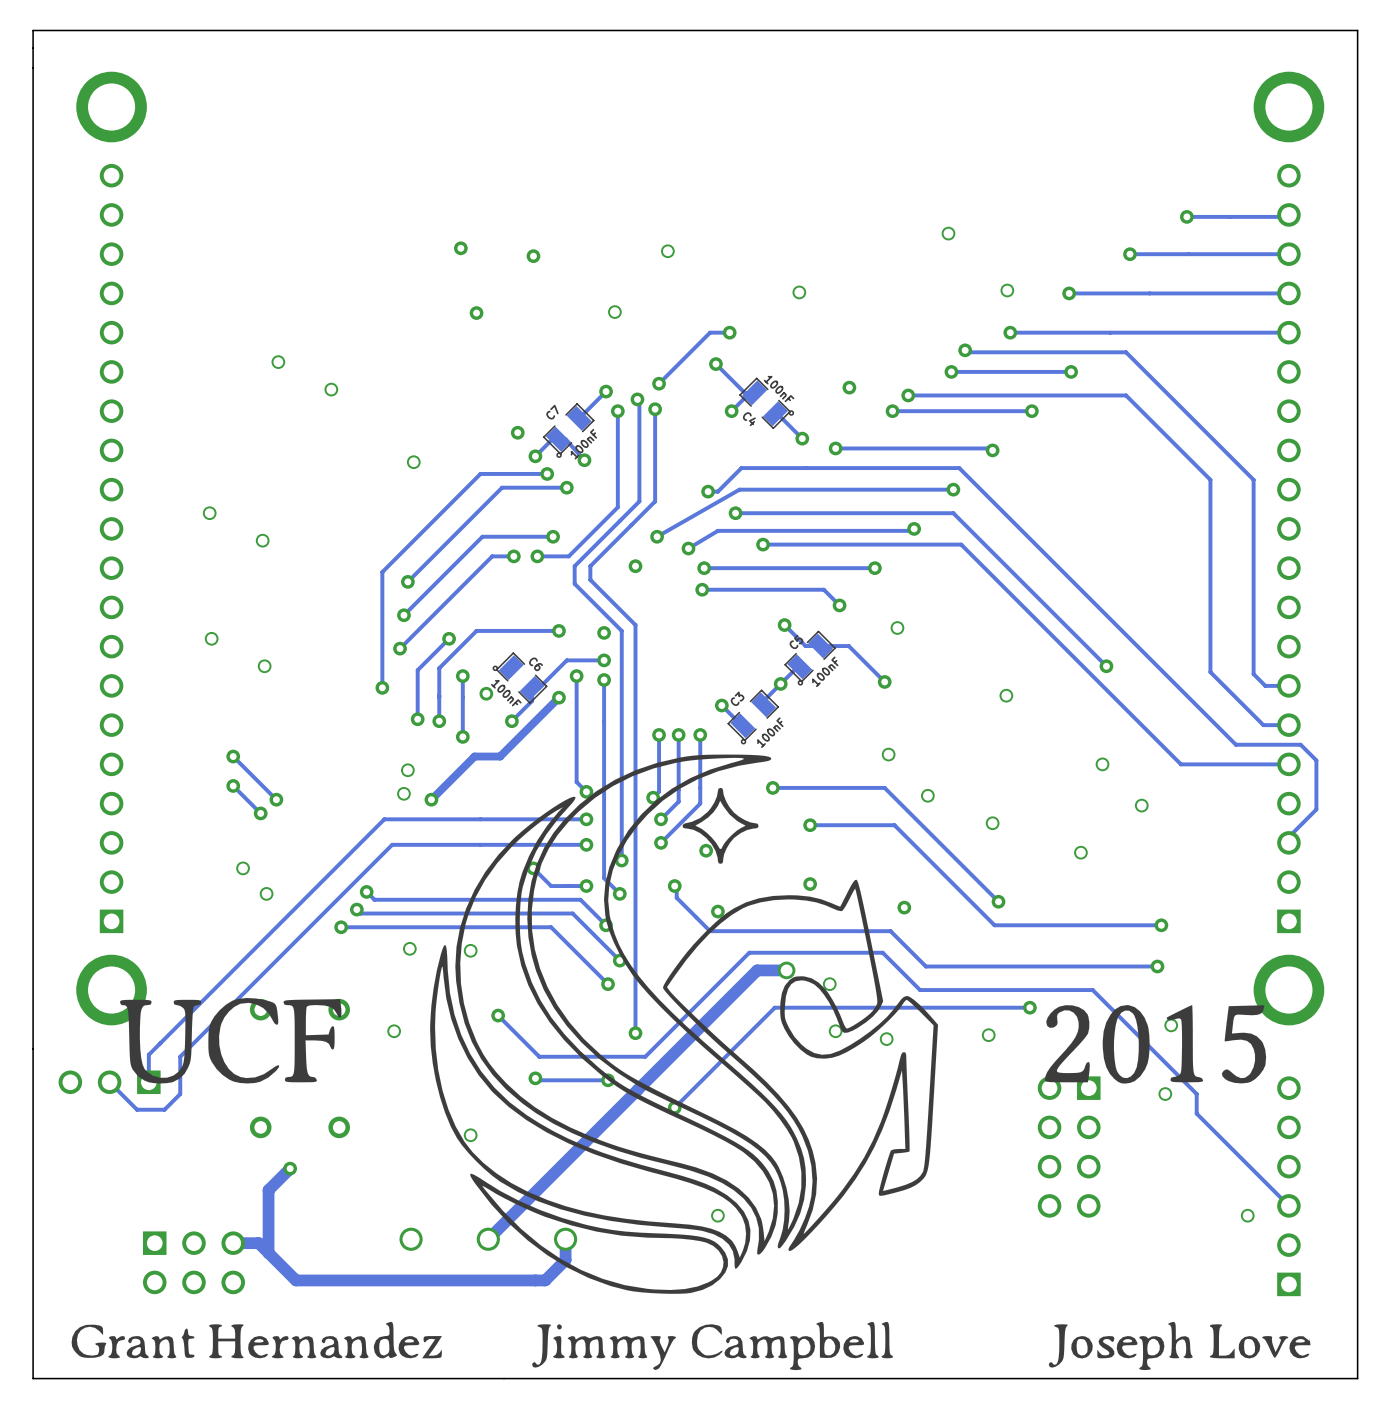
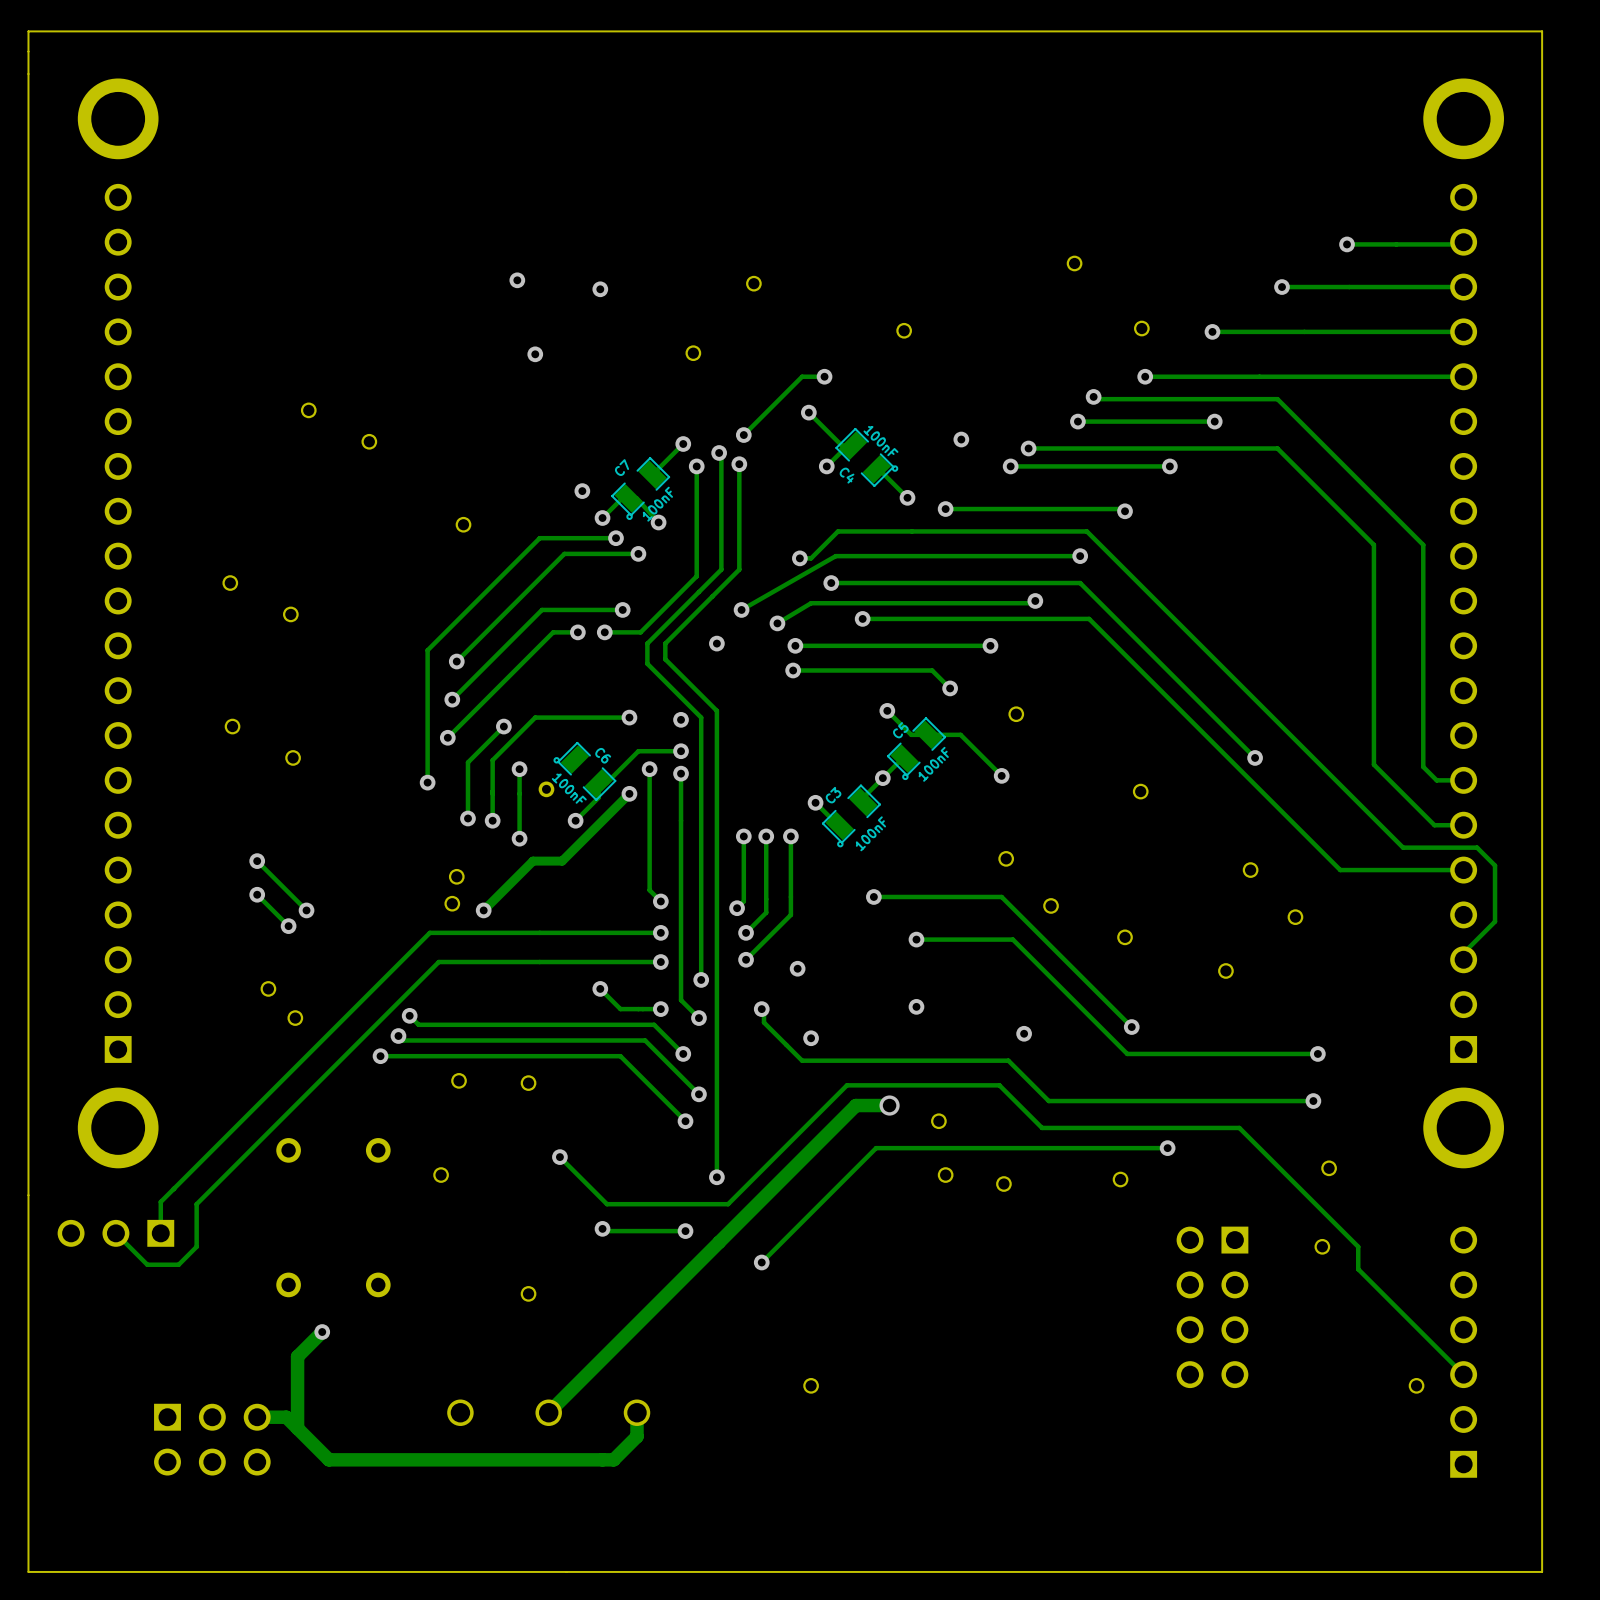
drawing: [71, 754, 1311, 1371] -> none

